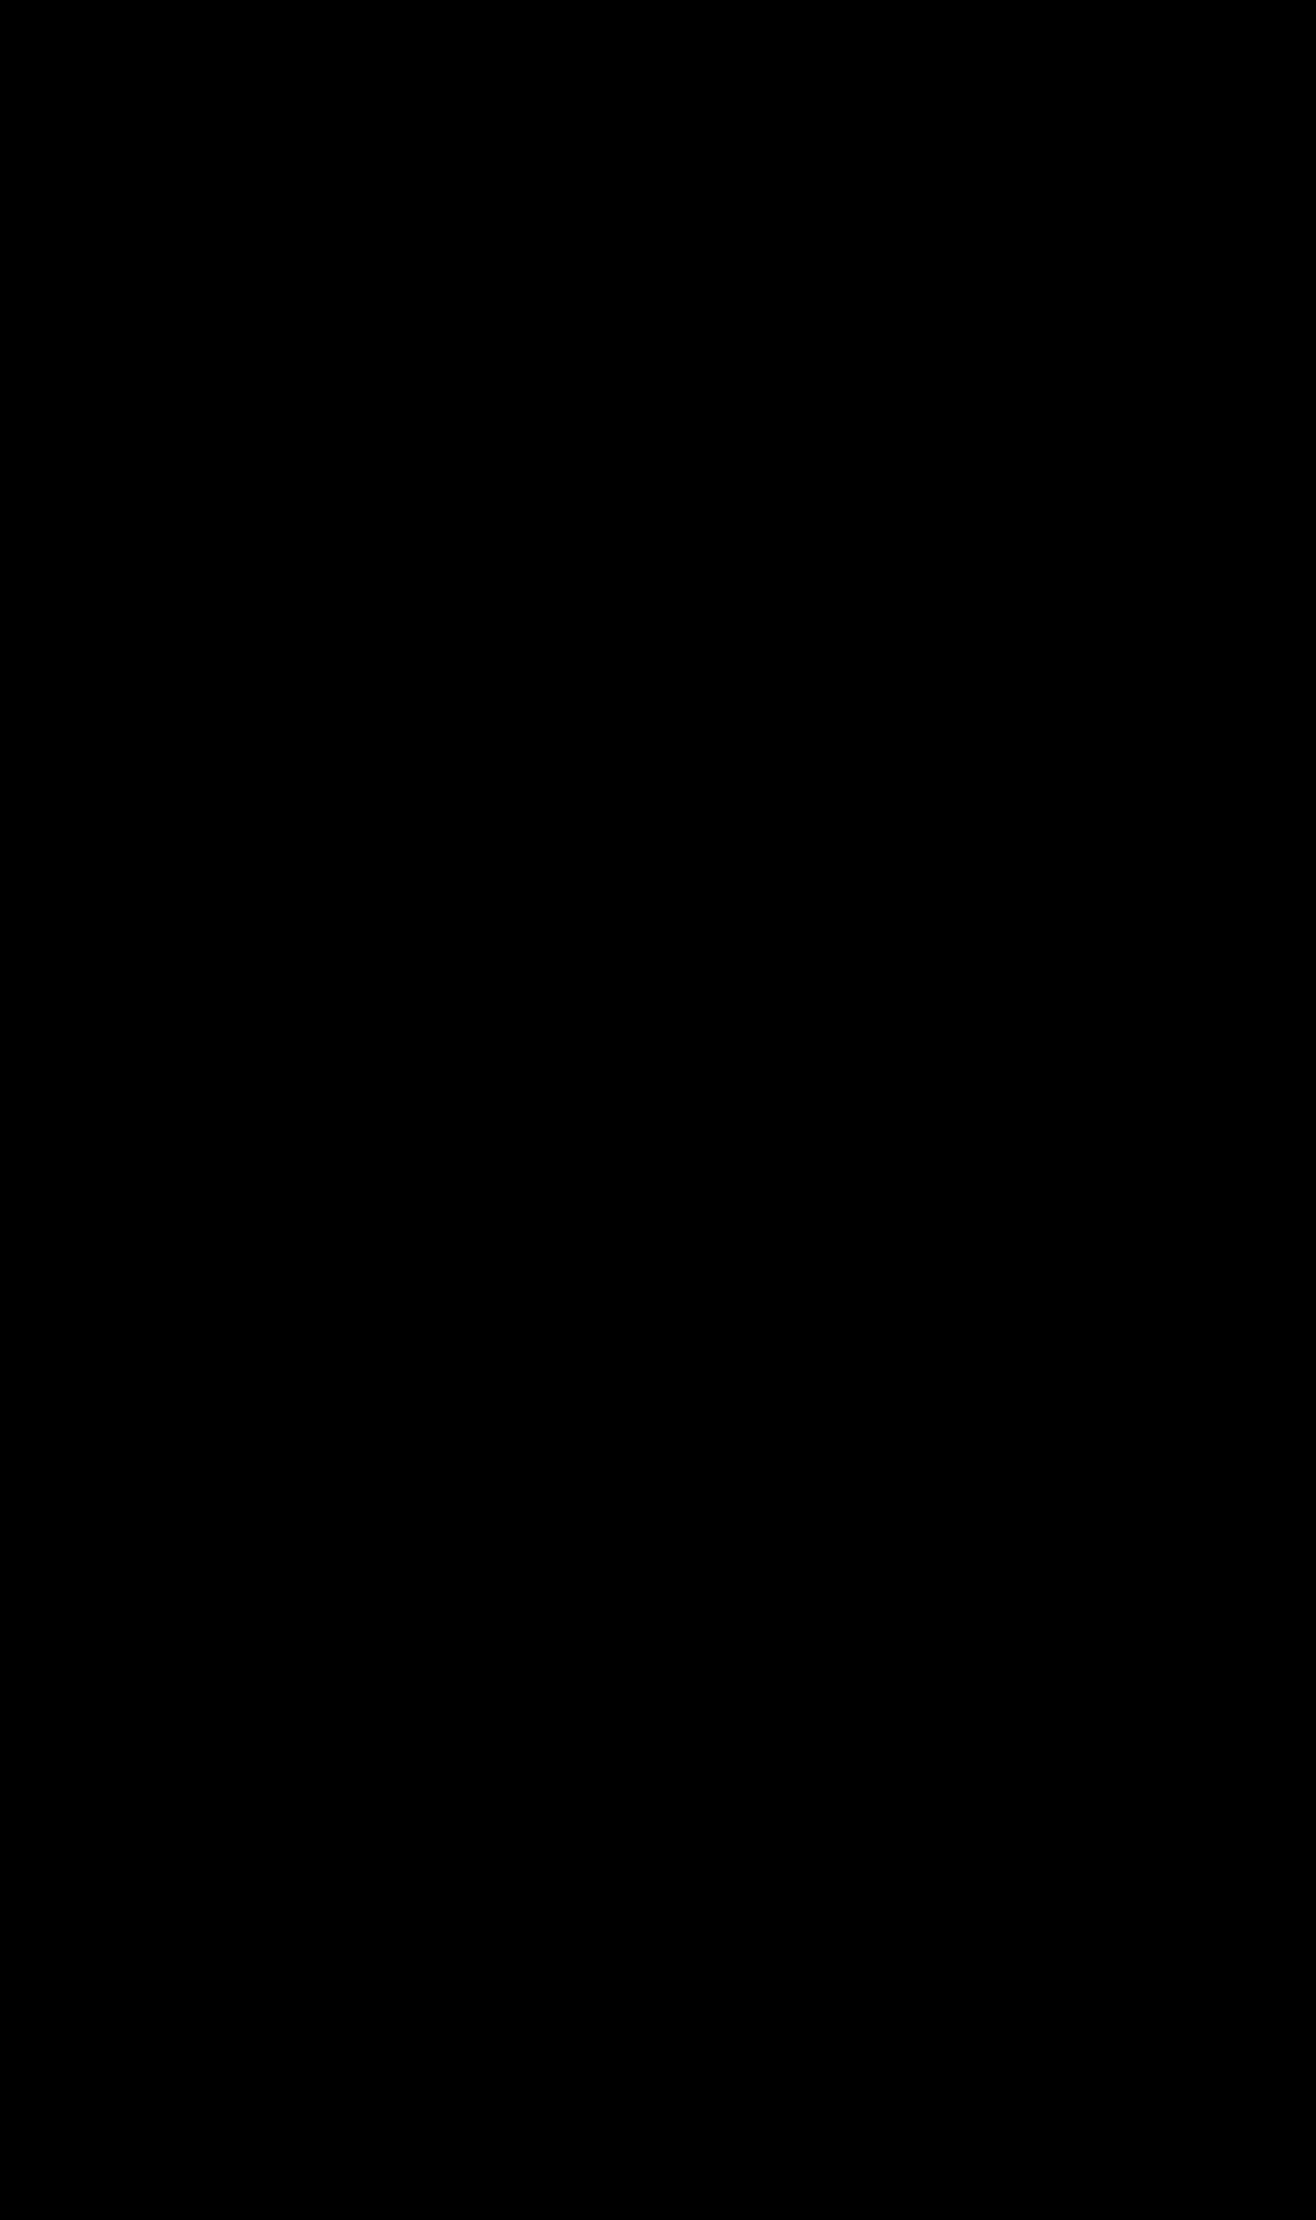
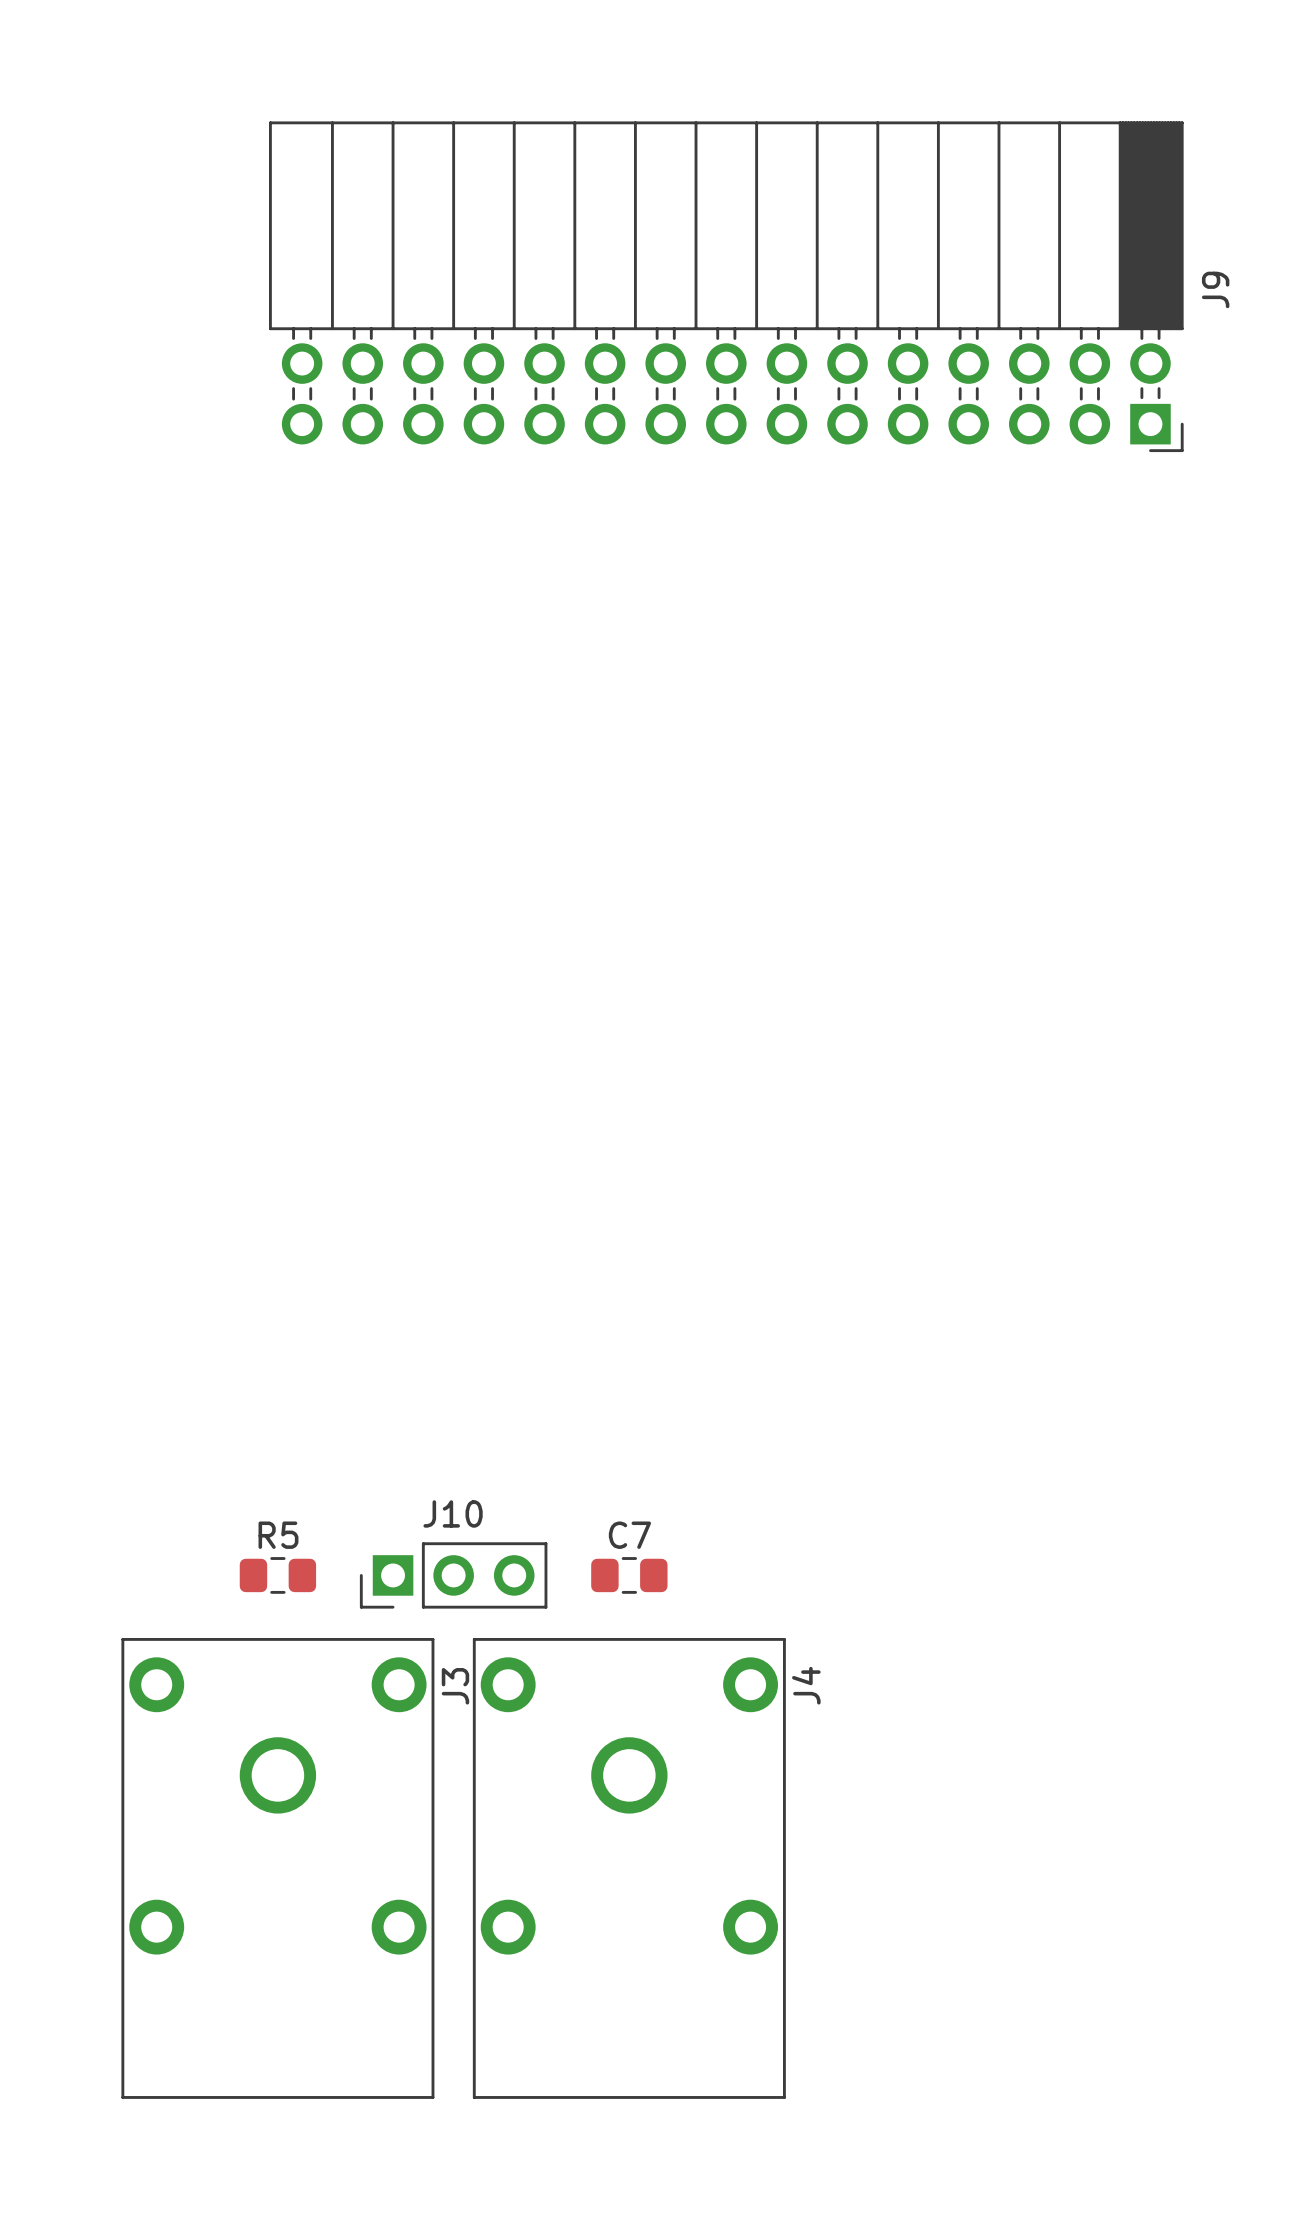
J9: none -> (726, 286)
R5: none -> (277, 1575)
J10: none -> (453, 1575)
C7: none -> (629, 1575)
J3: none -> (277, 1868)
J4: none -> (629, 1868)

